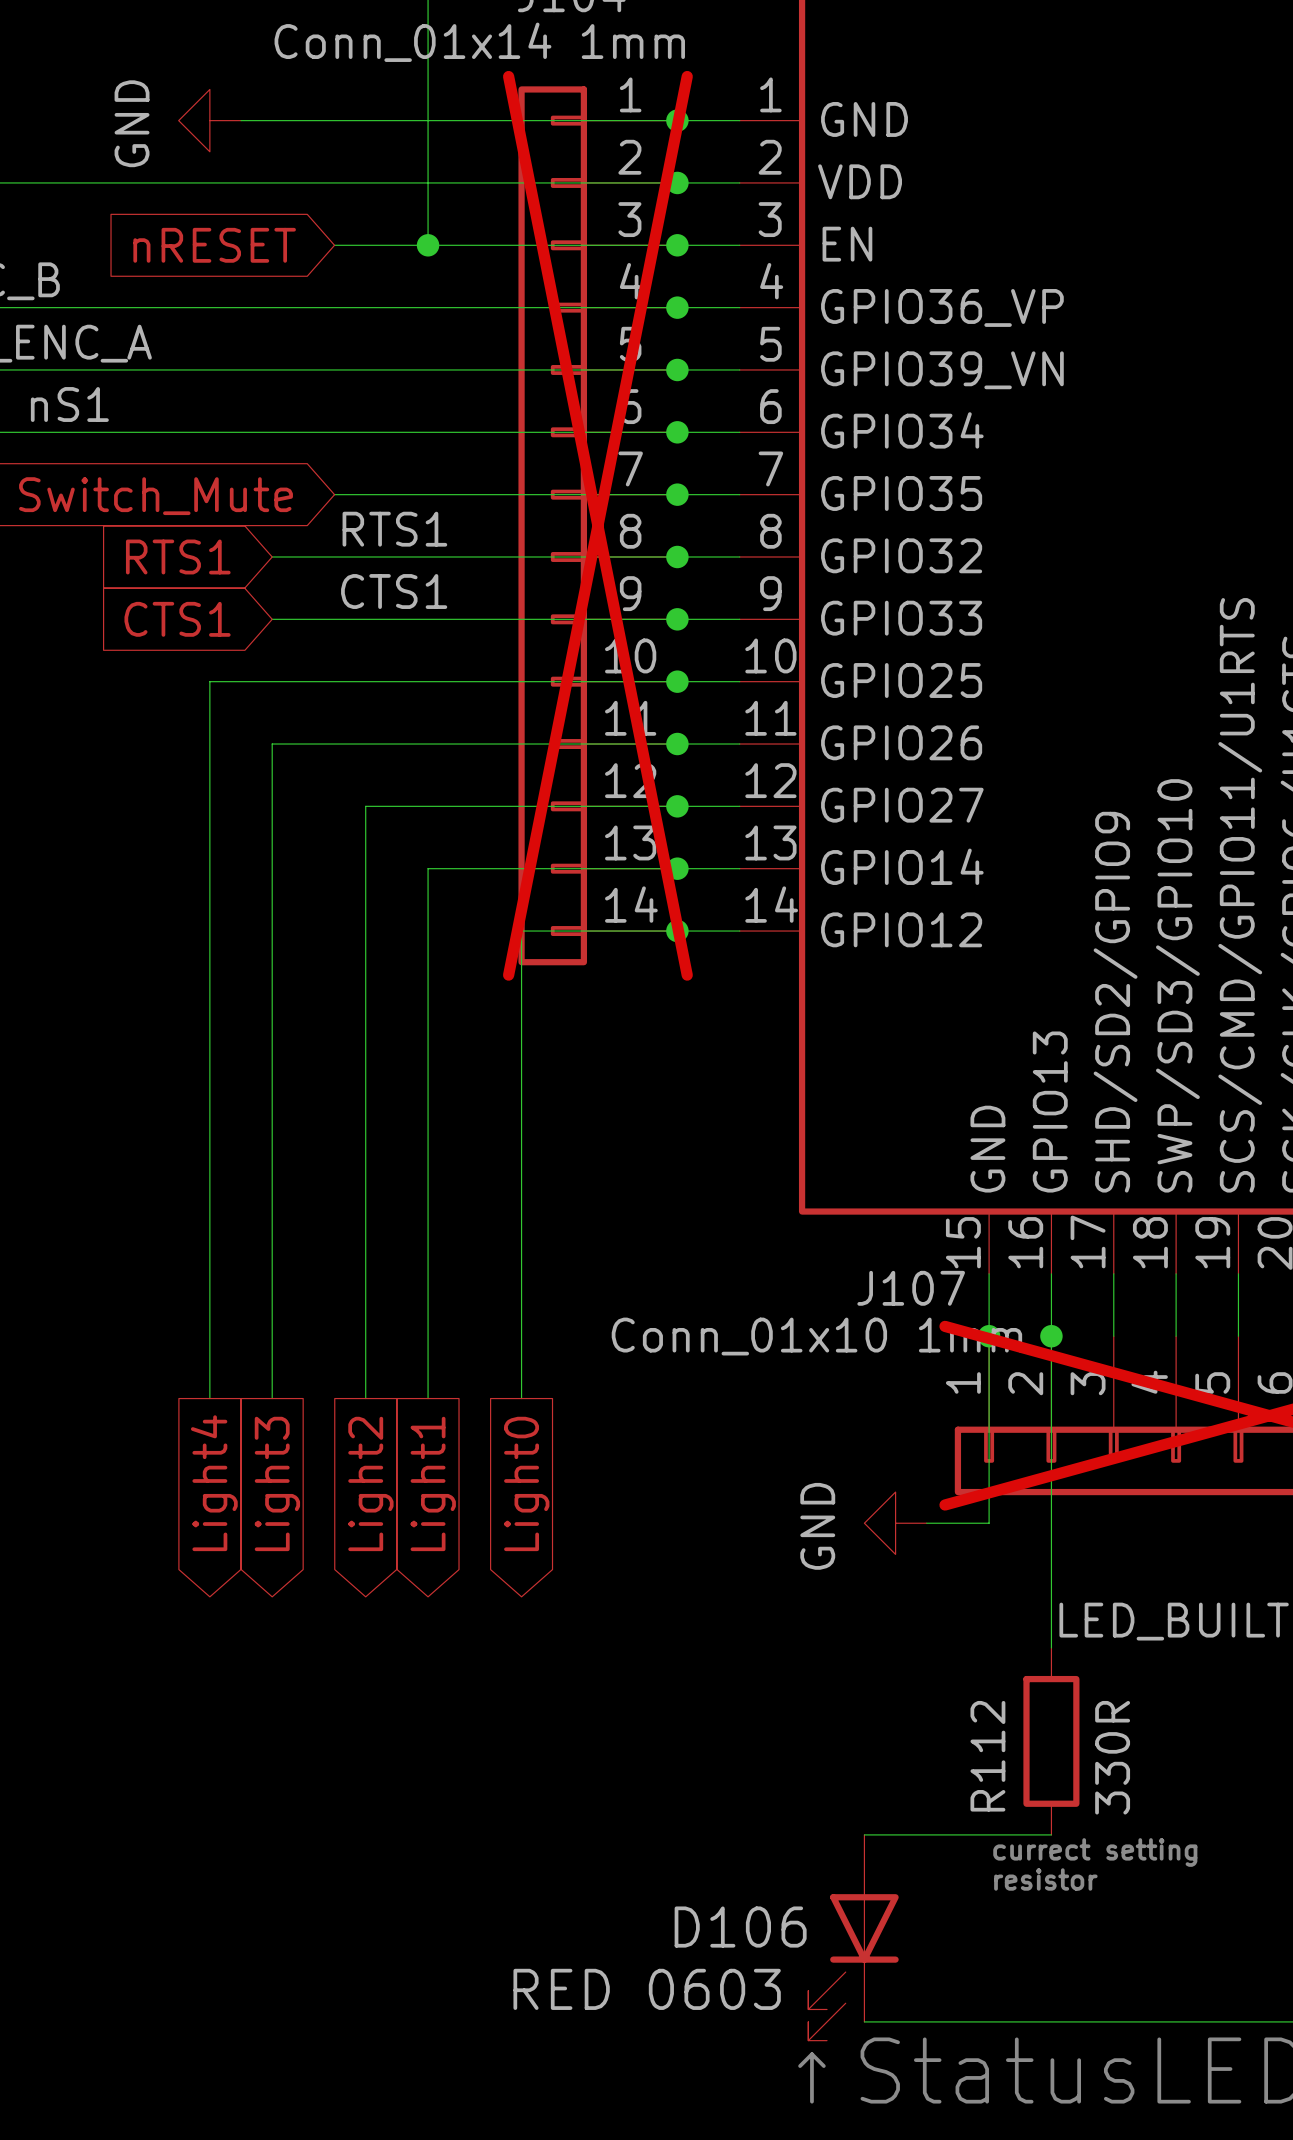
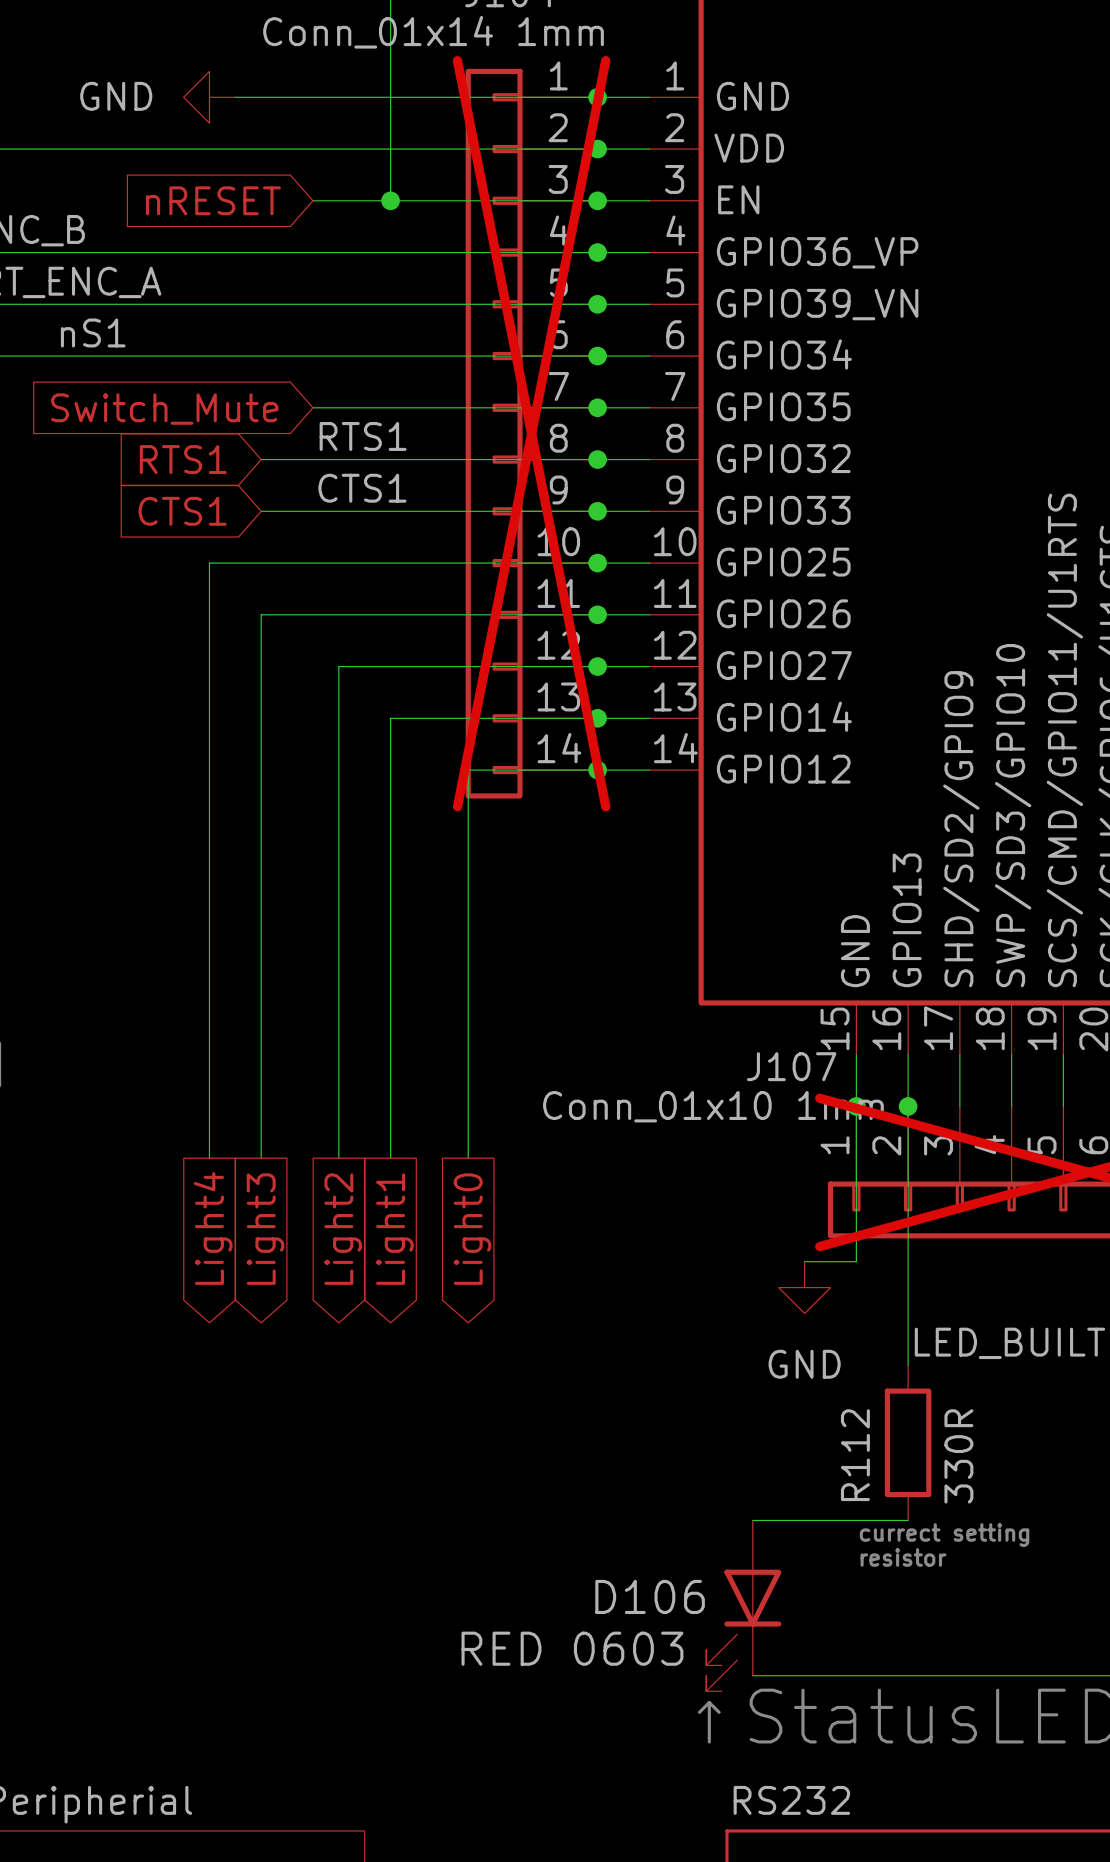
power symbol text rotation: 0° (132, 123) -> 90° clockwise (116, 96)
power symbol rotation: 0° (895, 1523) -> 90° counterclockwise (804, 1287)
power symbol position: GND (895, 1523) -> GND (804, 1287)

